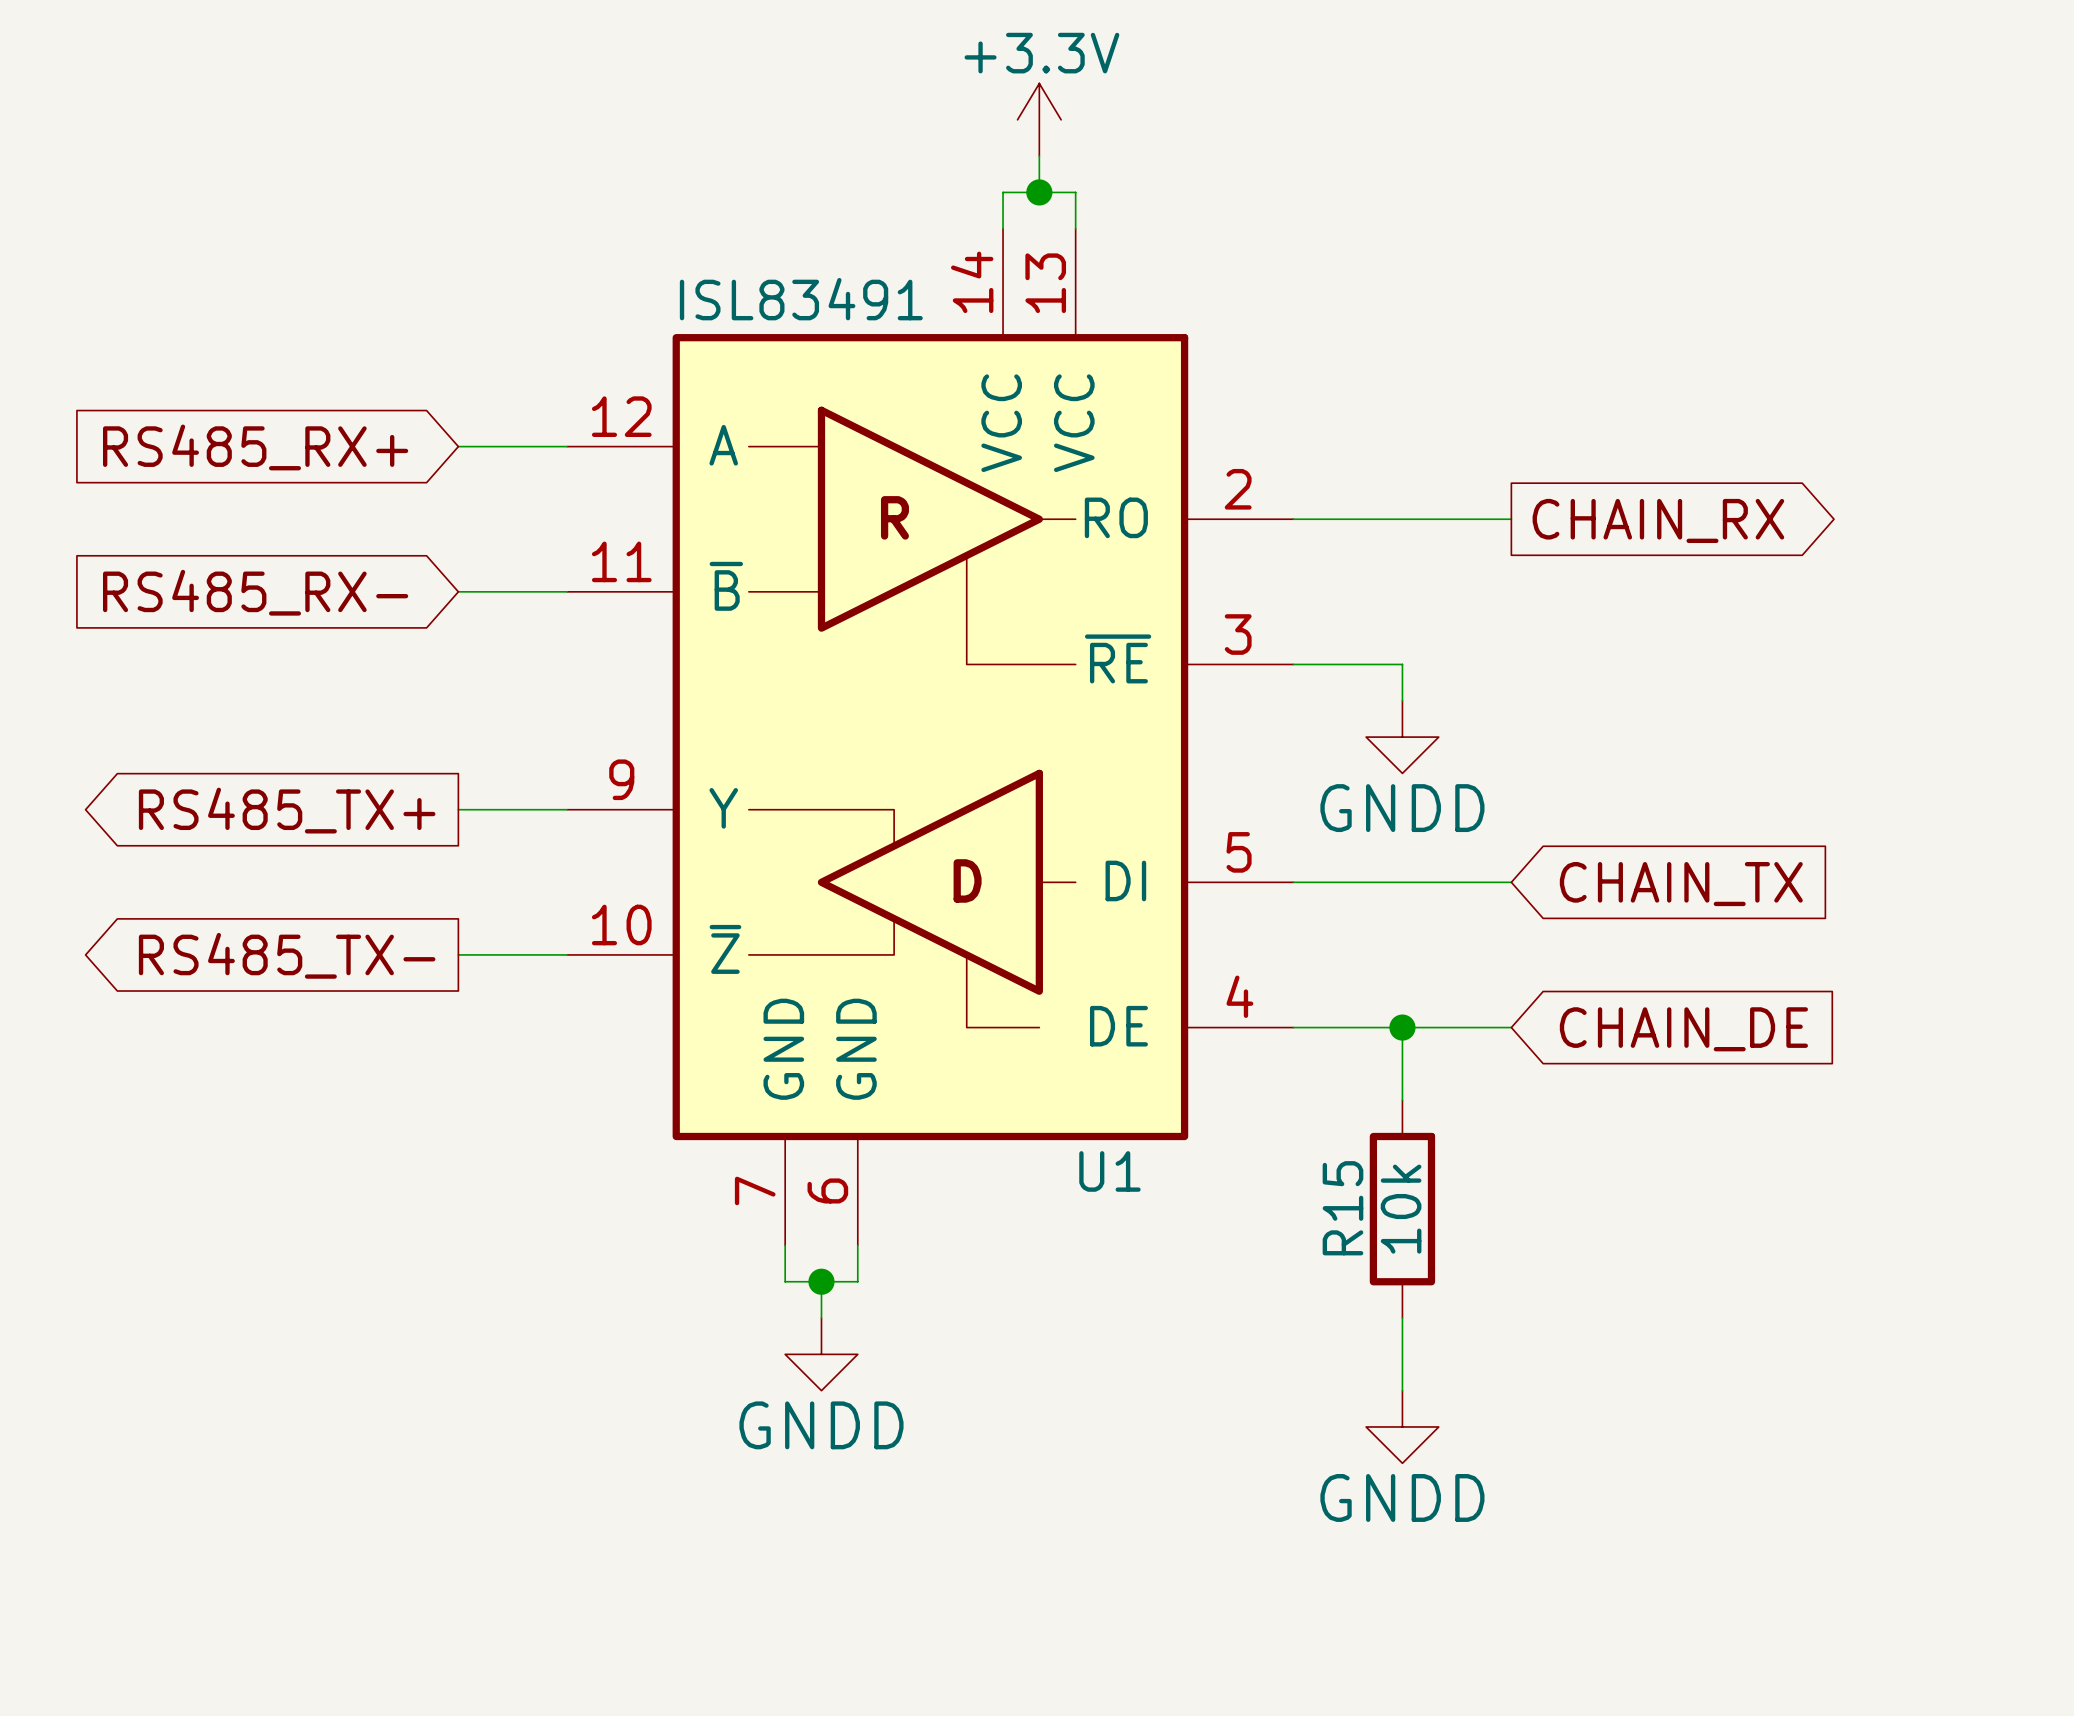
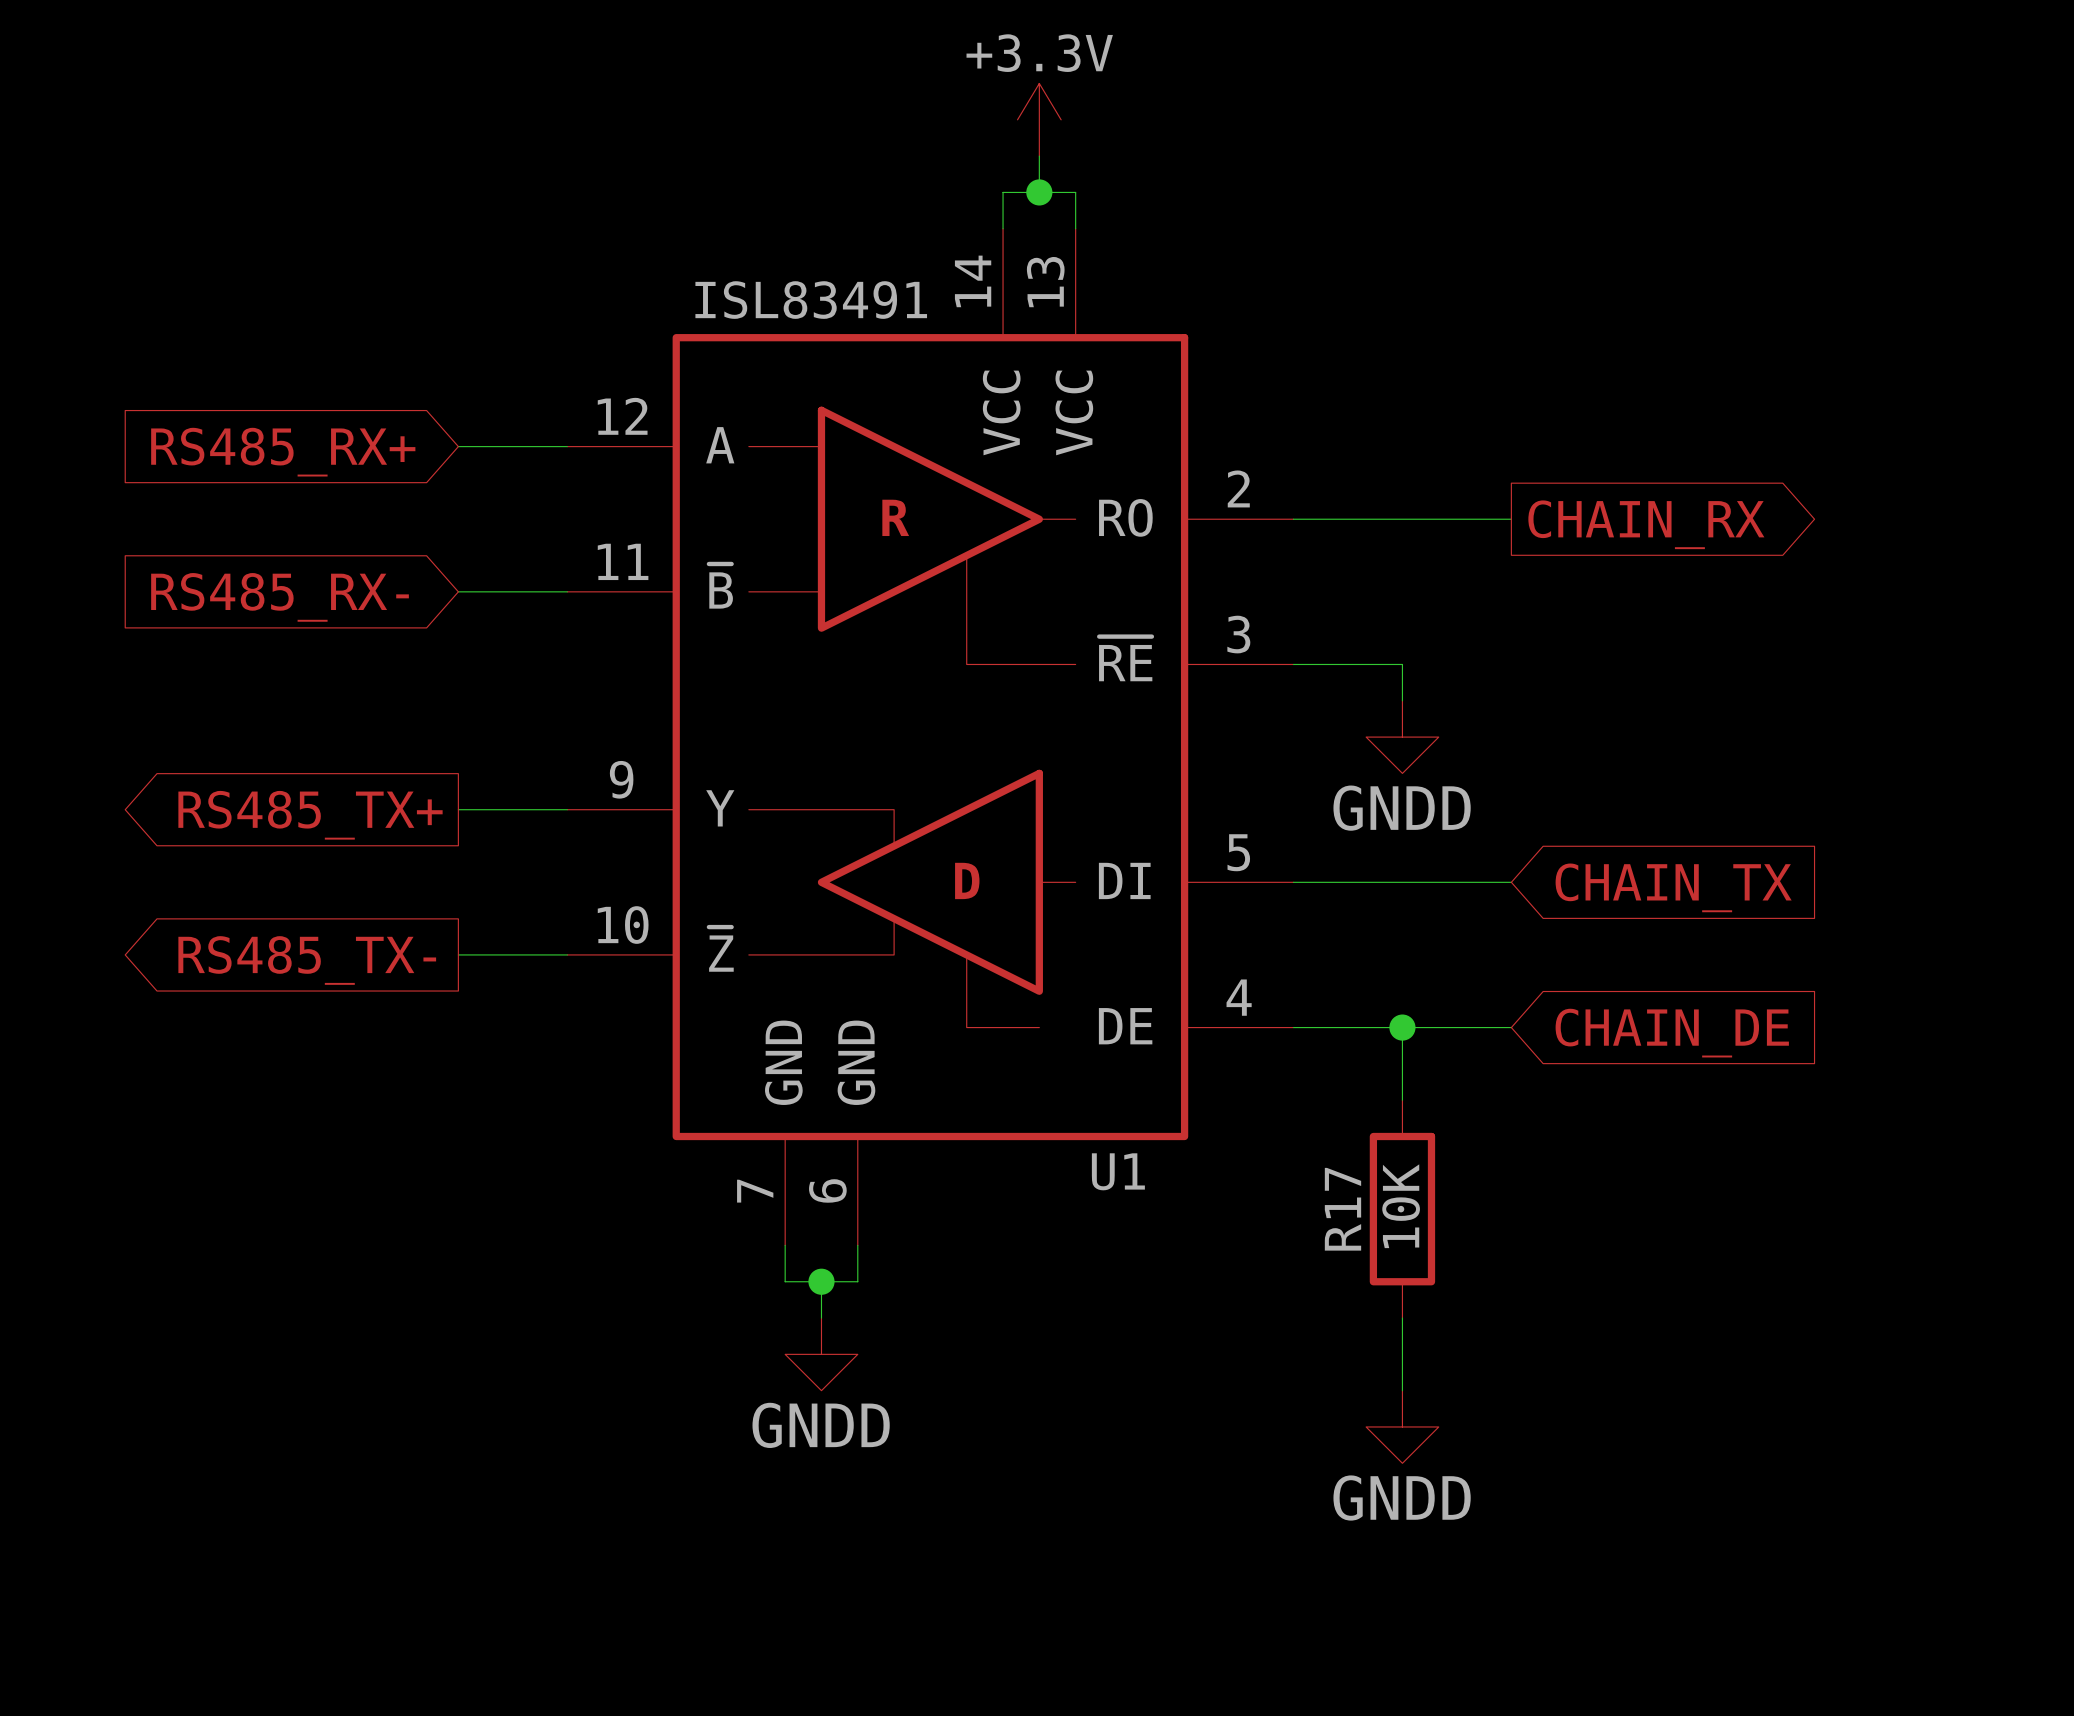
R15 name: R15 (1342, 1208) -> R17 (1342, 1209)
R15 value: 10k (1401, 1209) -> 10K (1401, 1206)

